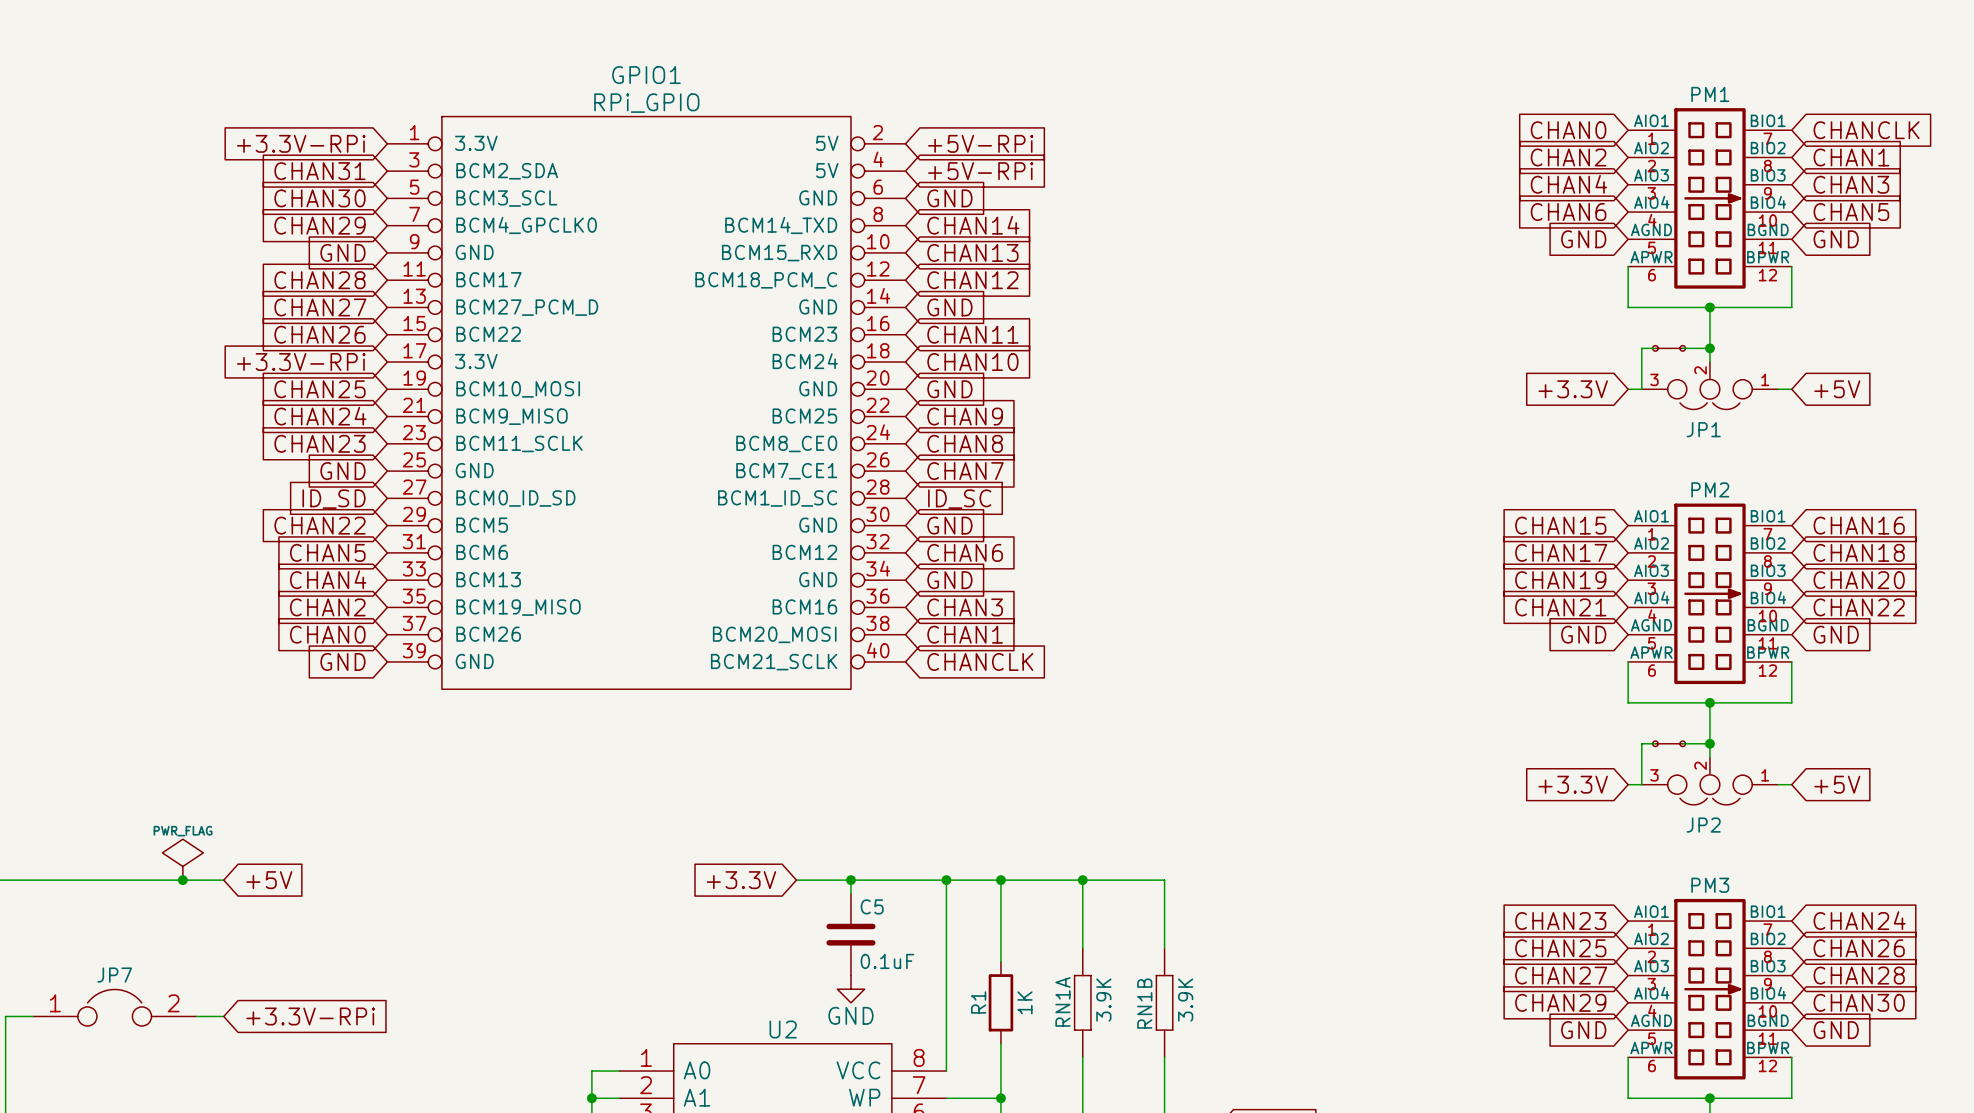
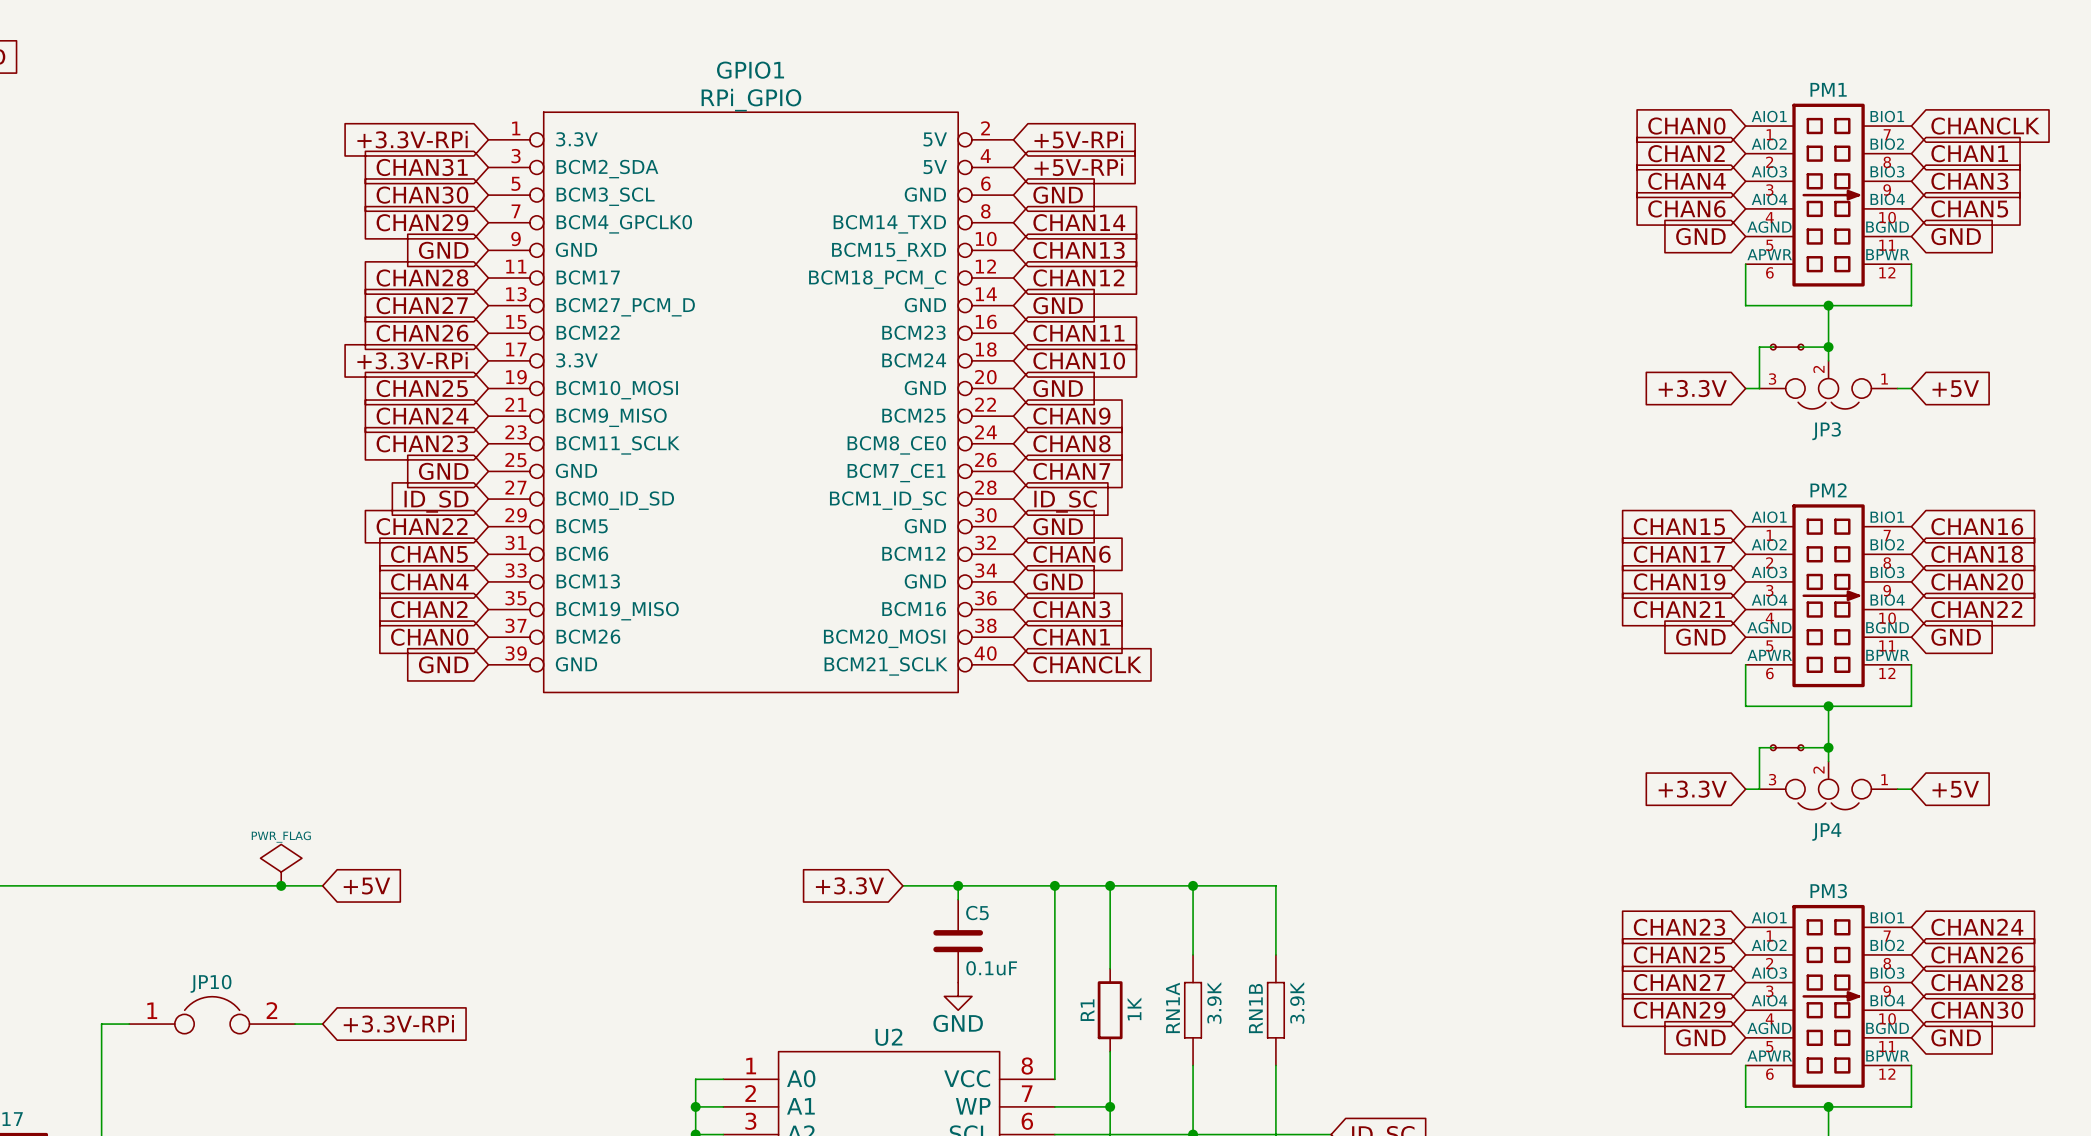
JP1 name: JP1 (1703, 429) -> JP3 (1826, 431)
JP2 name: JP2 (1703, 825) -> JP4 (1826, 832)
JP7 name: JP7 (114, 975) -> JP10 (211, 983)

